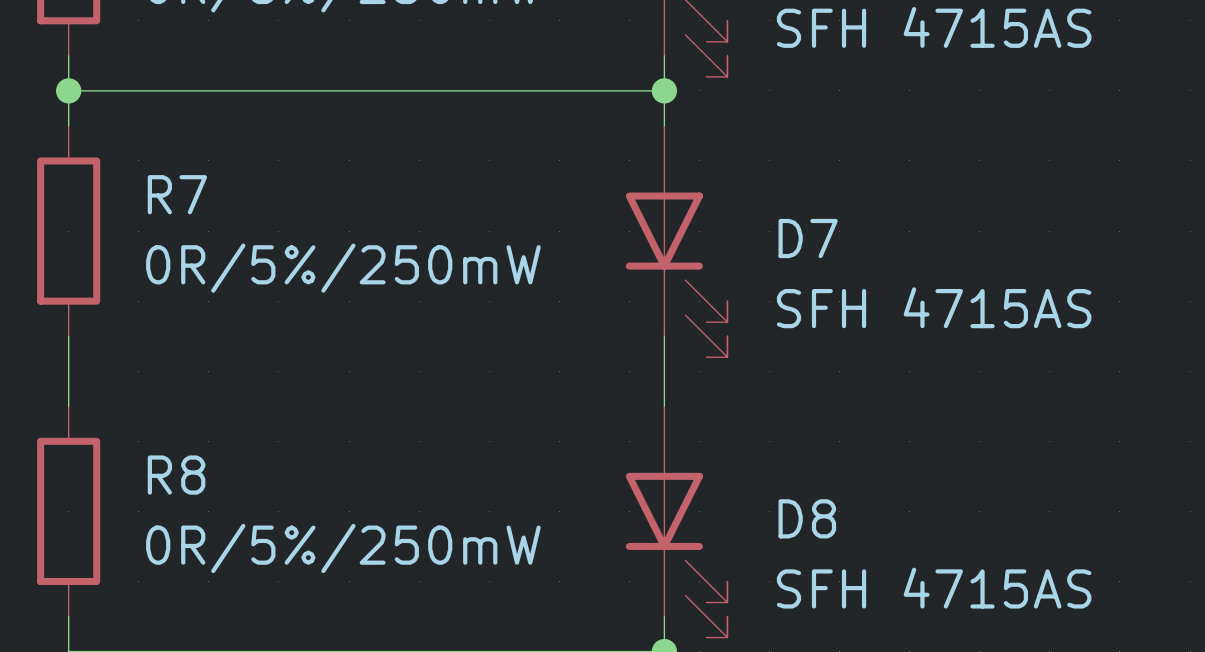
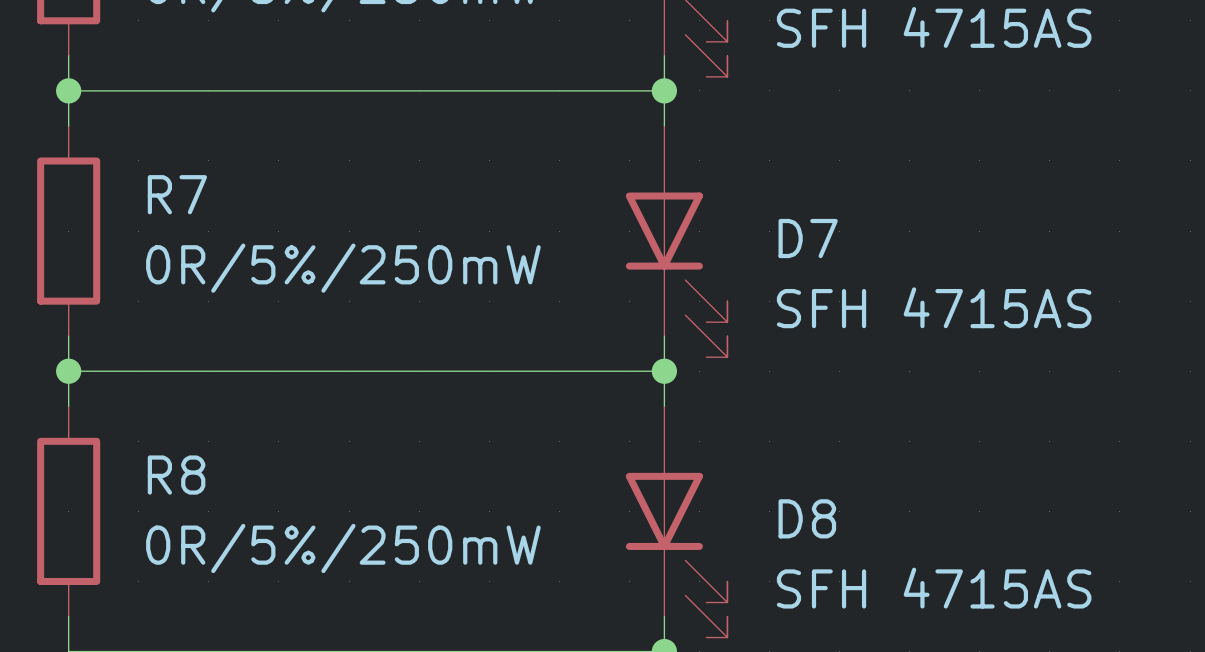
wire: none -> (68, 371) (664, 371)
junction: none -> (68, 371)
junction: none -> (664, 371)

